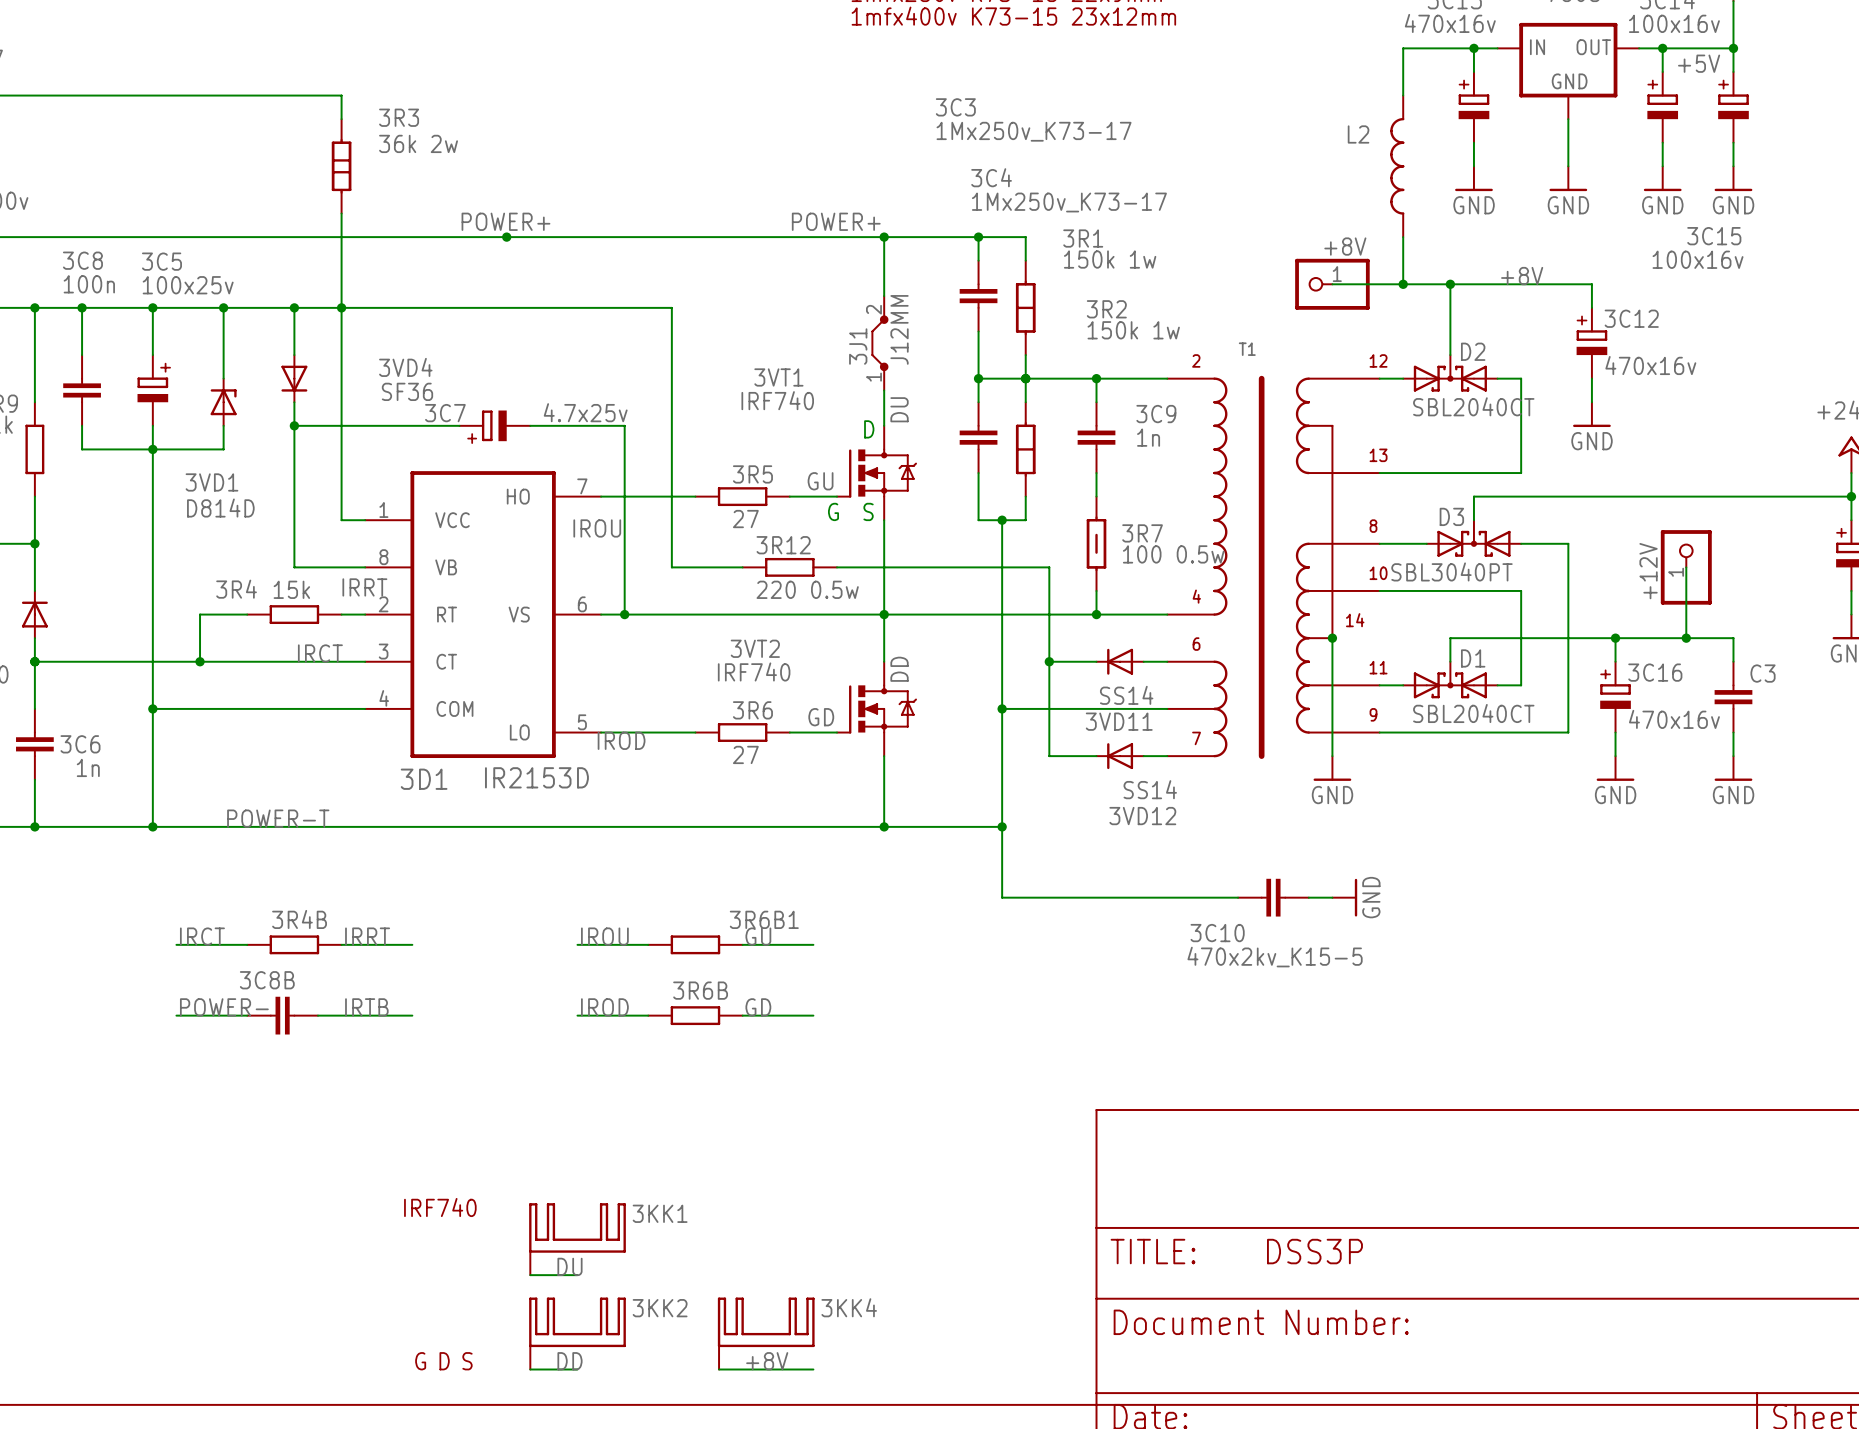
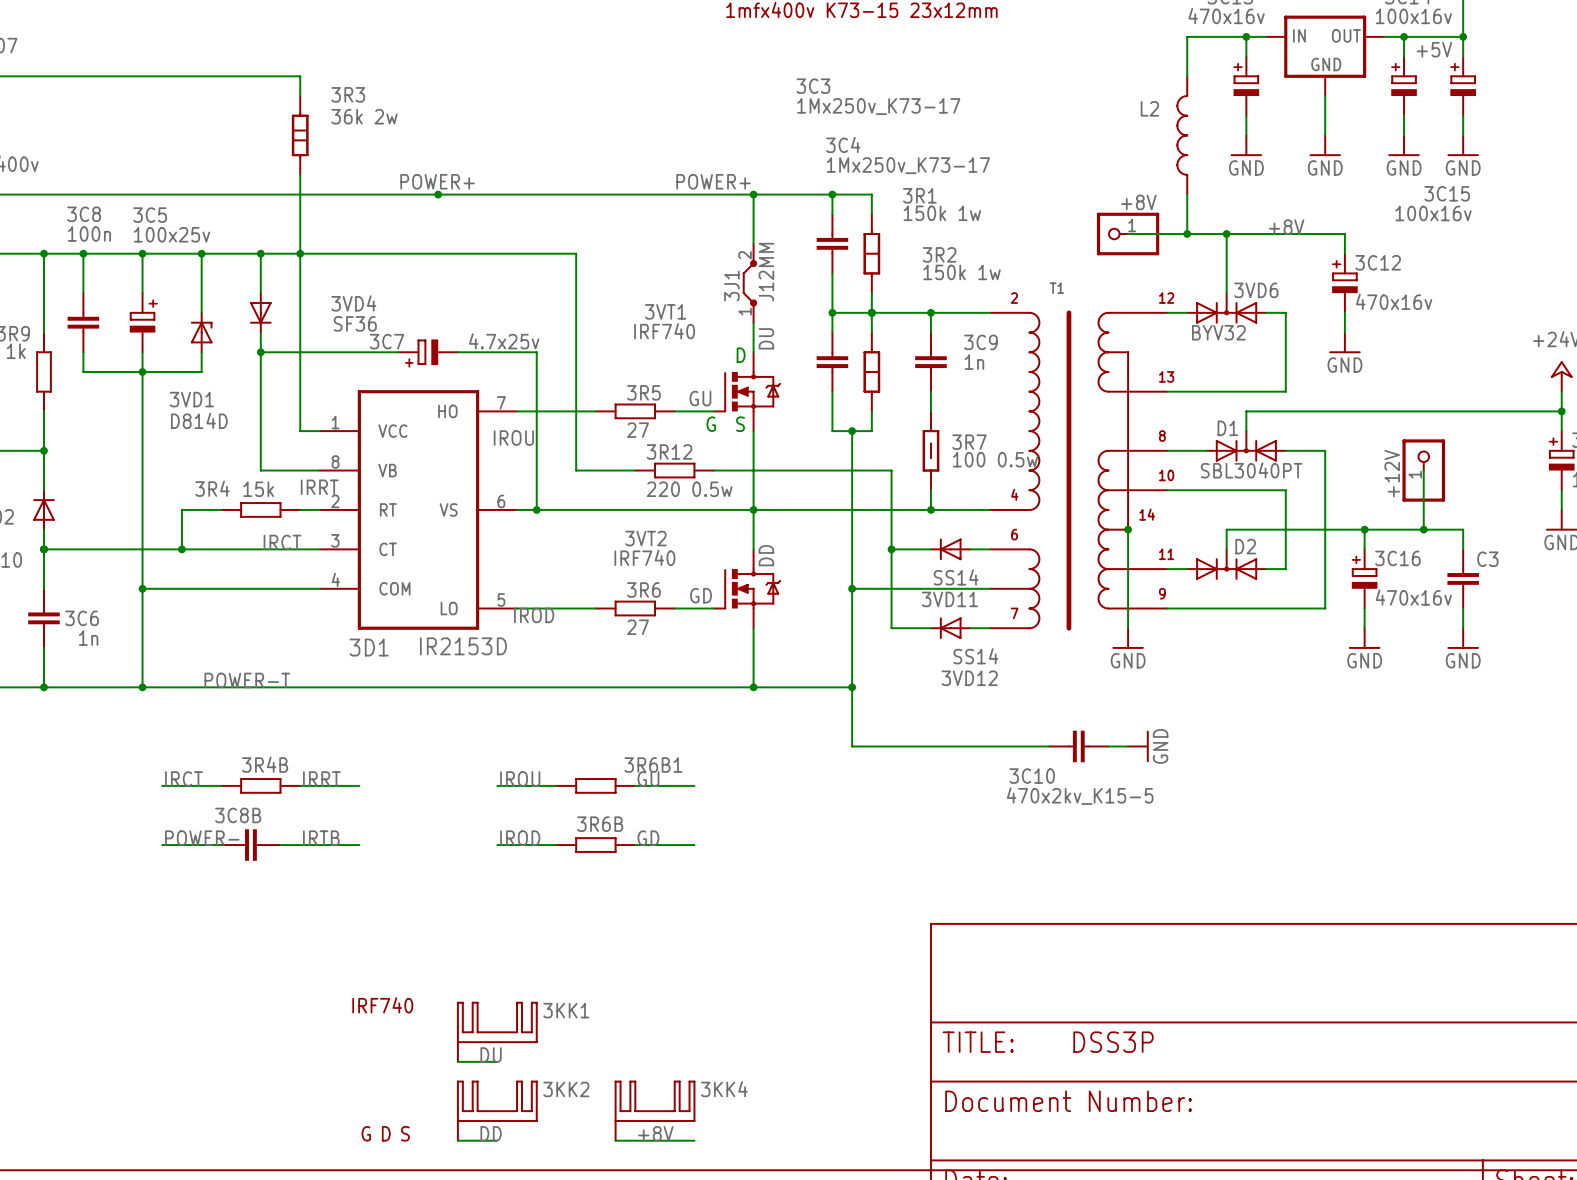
D2 symbol: [1403, 355, 1498, 392] -> [1187, 549, 1267, 580]
3VD6: none -> BYV32 (1226, 308)
D2 value: SBL2040CT (1473, 406) -> none
D3: SBL3040PT (1473, 538) -> none
D1 name position: D1 (1473, 658) -> D1 (1227, 428)
D1 symbol: [1403, 661, 1498, 699] -> [1206, 431, 1286, 462]
D1 value: SBL2040CT (1473, 713) -> SBL3040PT (1251, 470)

